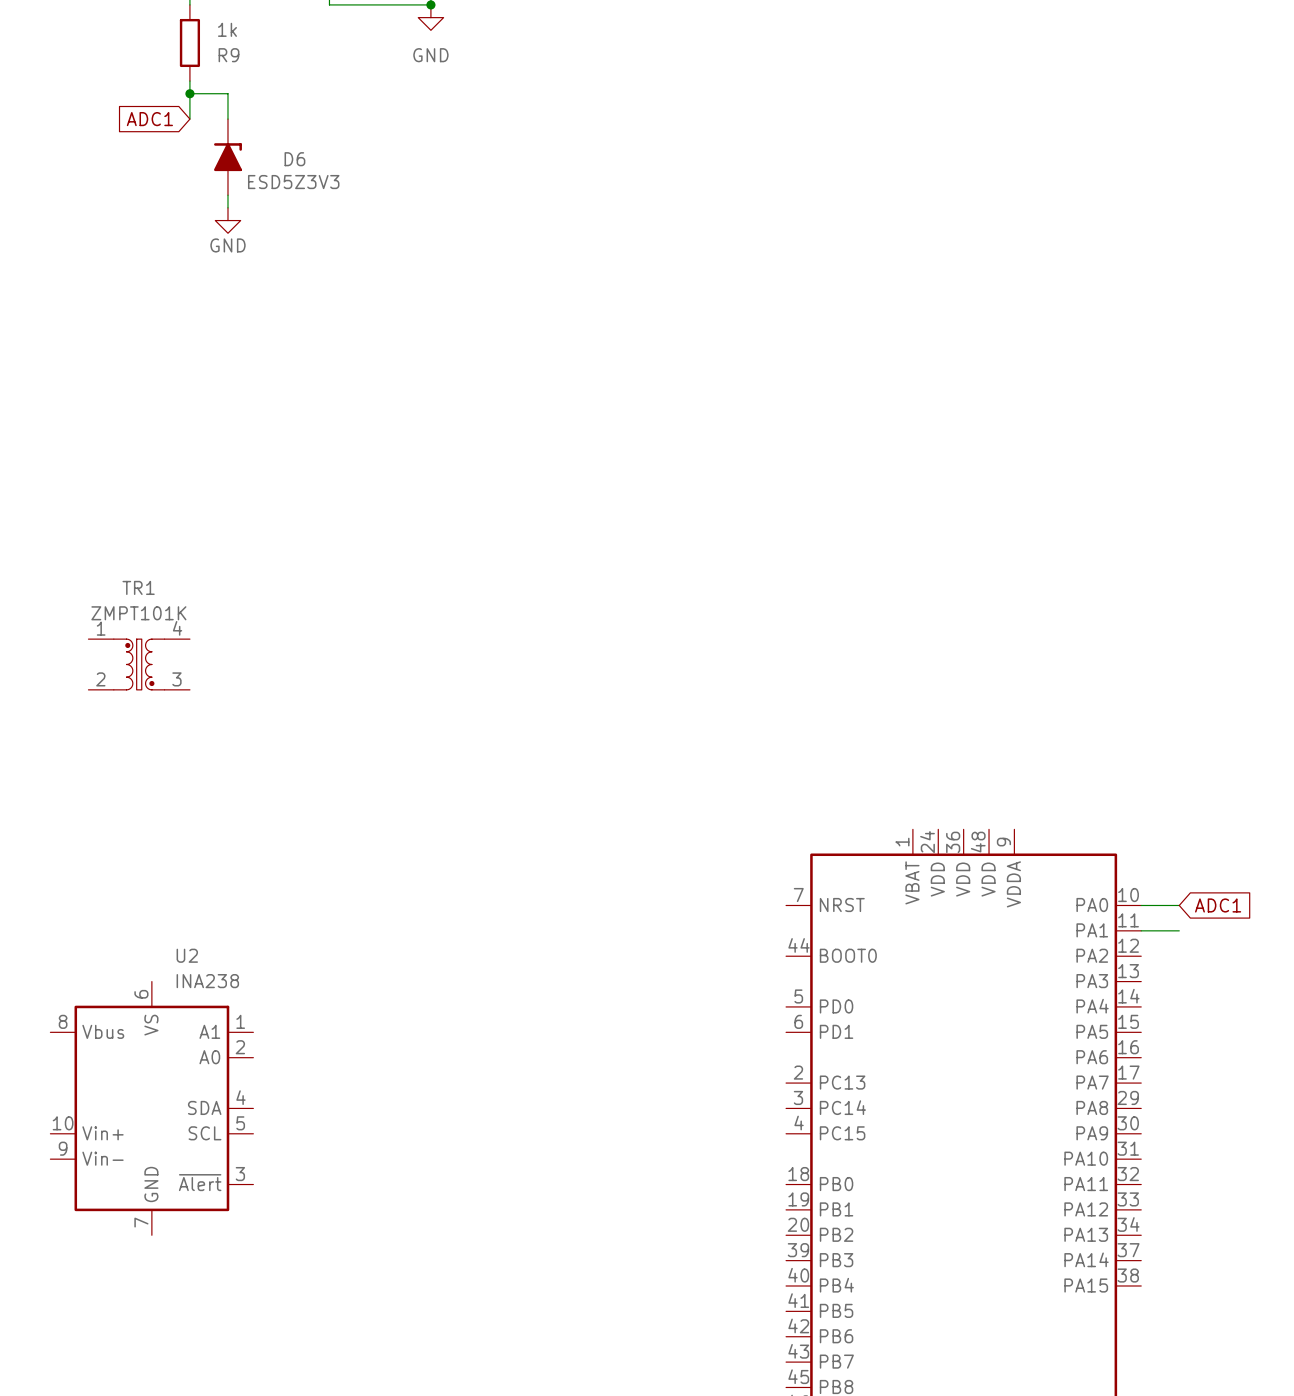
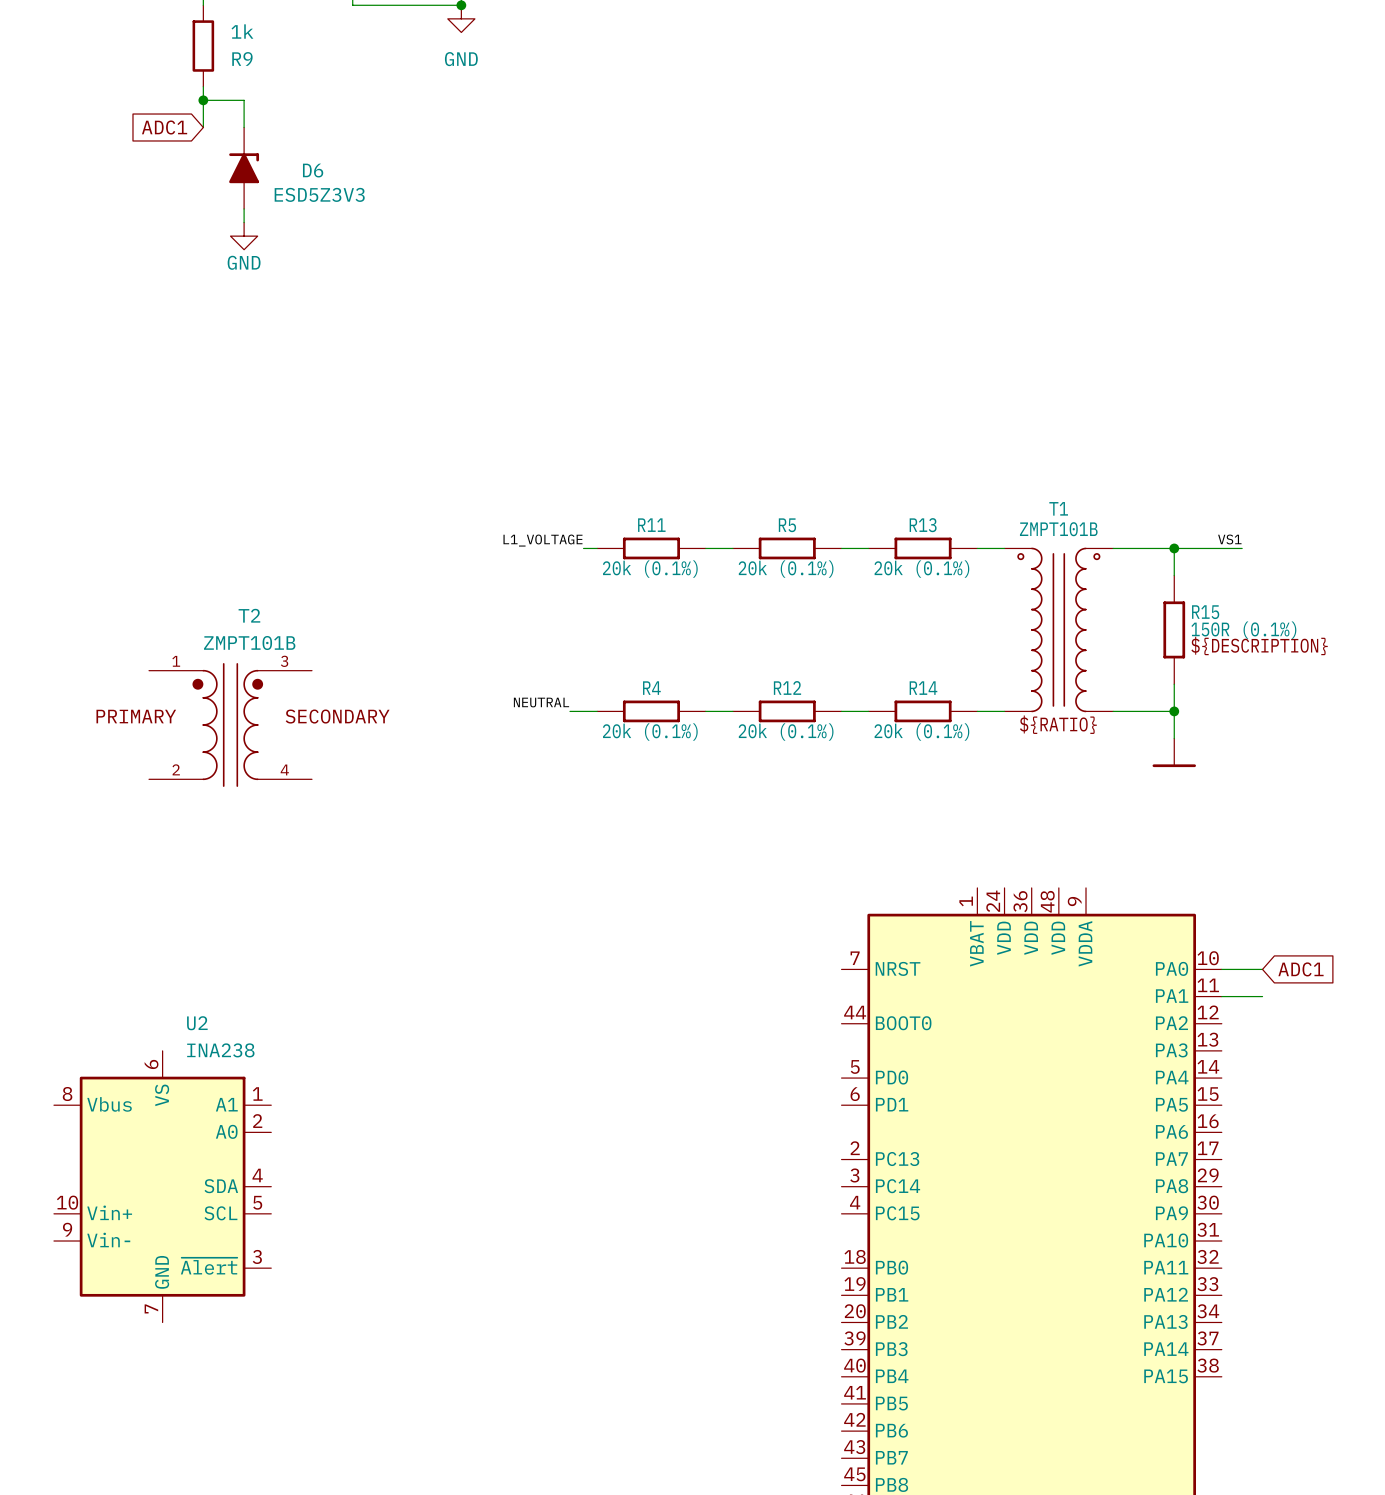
label: none -> VS1 (1229, 539)
label: none -> L1_VOLTAGE (542, 540)
wire: none -> (583, 548) (597, 548)
R11: none -> 20k (0.1%) (651, 548)
wire: none -> (705, 548) (732, 548)
R5: none -> 20k (0.1%) (787, 548)
wire: none -> (841, 548) (868, 548)
R13: none -> 20k (0.1%) (923, 548)
wire: none -> (977, 548) (1004, 548)
wire: none -> (1113, 548) (1242, 548)
wire: none -> (1174, 548) (1174, 575)
junction: none -> (1174, 548)
T1: none -> ZMPT101B (1058, 629)
R15: none -> 150R (0.1%) (1174, 629)
wire: none -> (1174, 684) (1174, 738)
label: none -> NEUTRAL (541, 702)
TR1: ZMPT101K (139, 664) -> none
wire: none -> (569, 711) (597, 711)
R4: none -> 20k (0.1%) (651, 711)
wire: none -> (705, 711) (732, 711)
R12: none -> 20k (0.1%) (787, 711)
wire: none -> (841, 711) (868, 711)
R14: none -> 20k (0.1%) (923, 711)
wire: none -> (977, 711) (1004, 711)
wire: none -> (1113, 711) (1174, 711)
junction: none -> (1174, 711)
T2: none -> ZMPT101B (230, 724)
power symbol: none -> (1174, 752)

